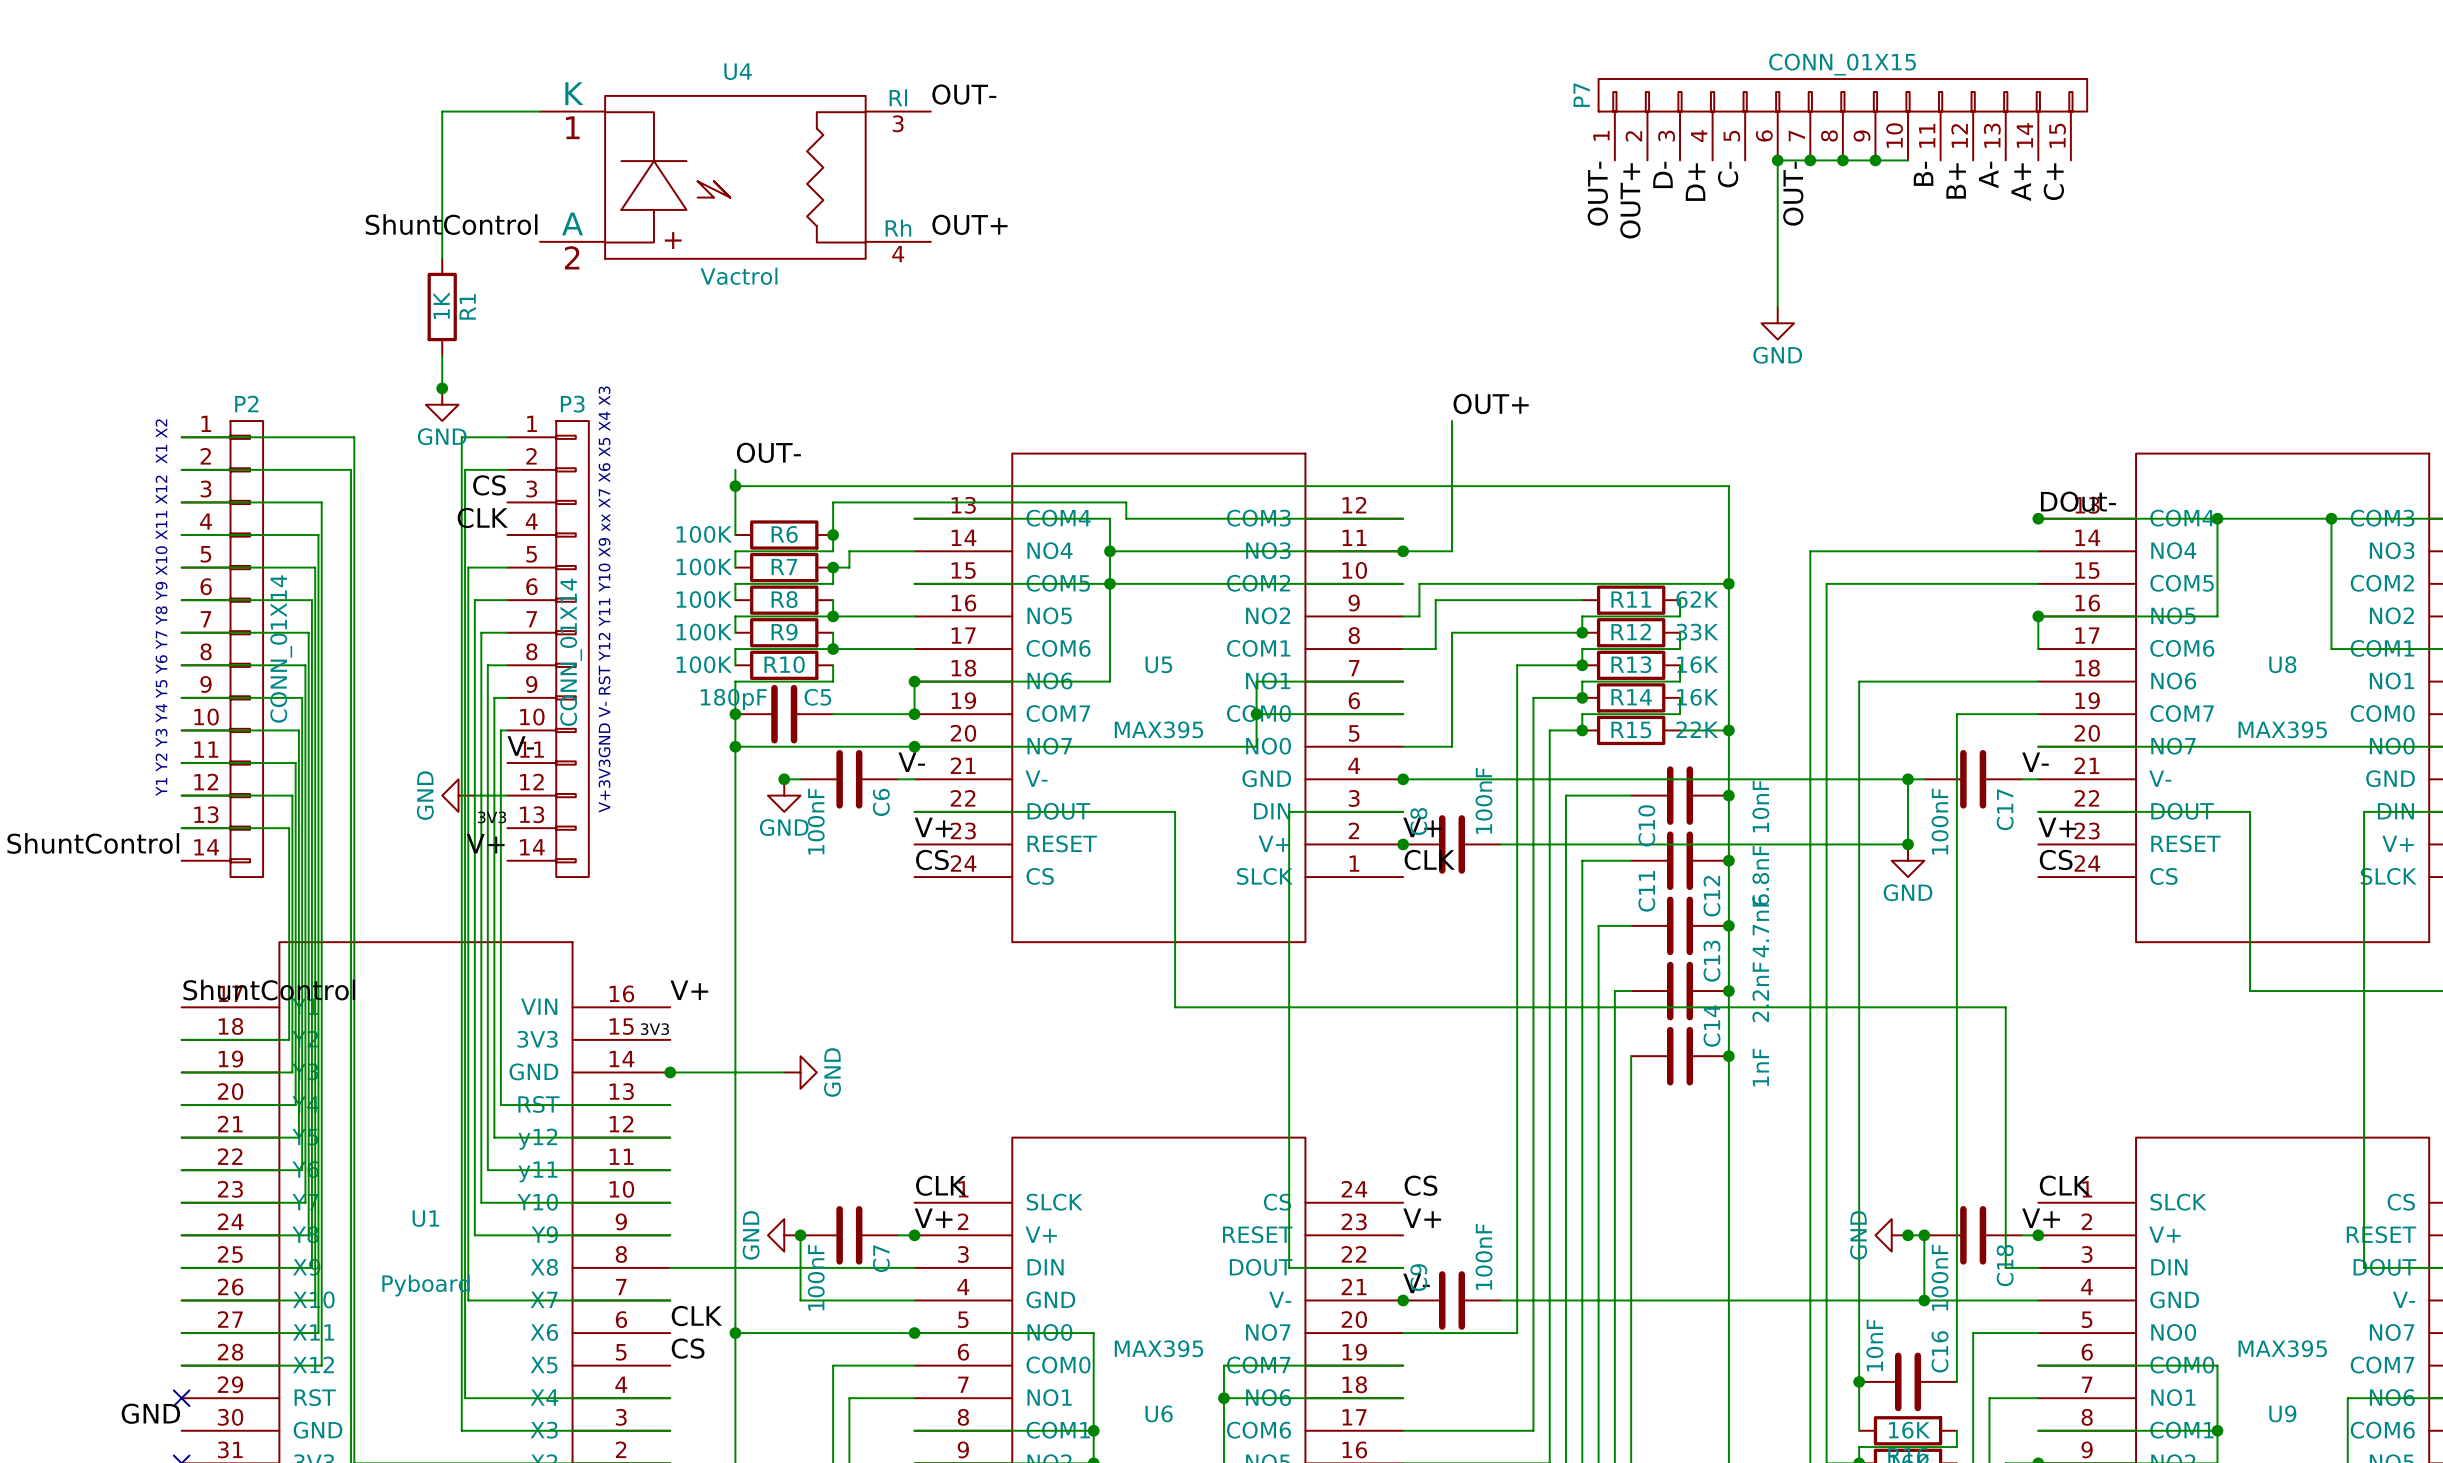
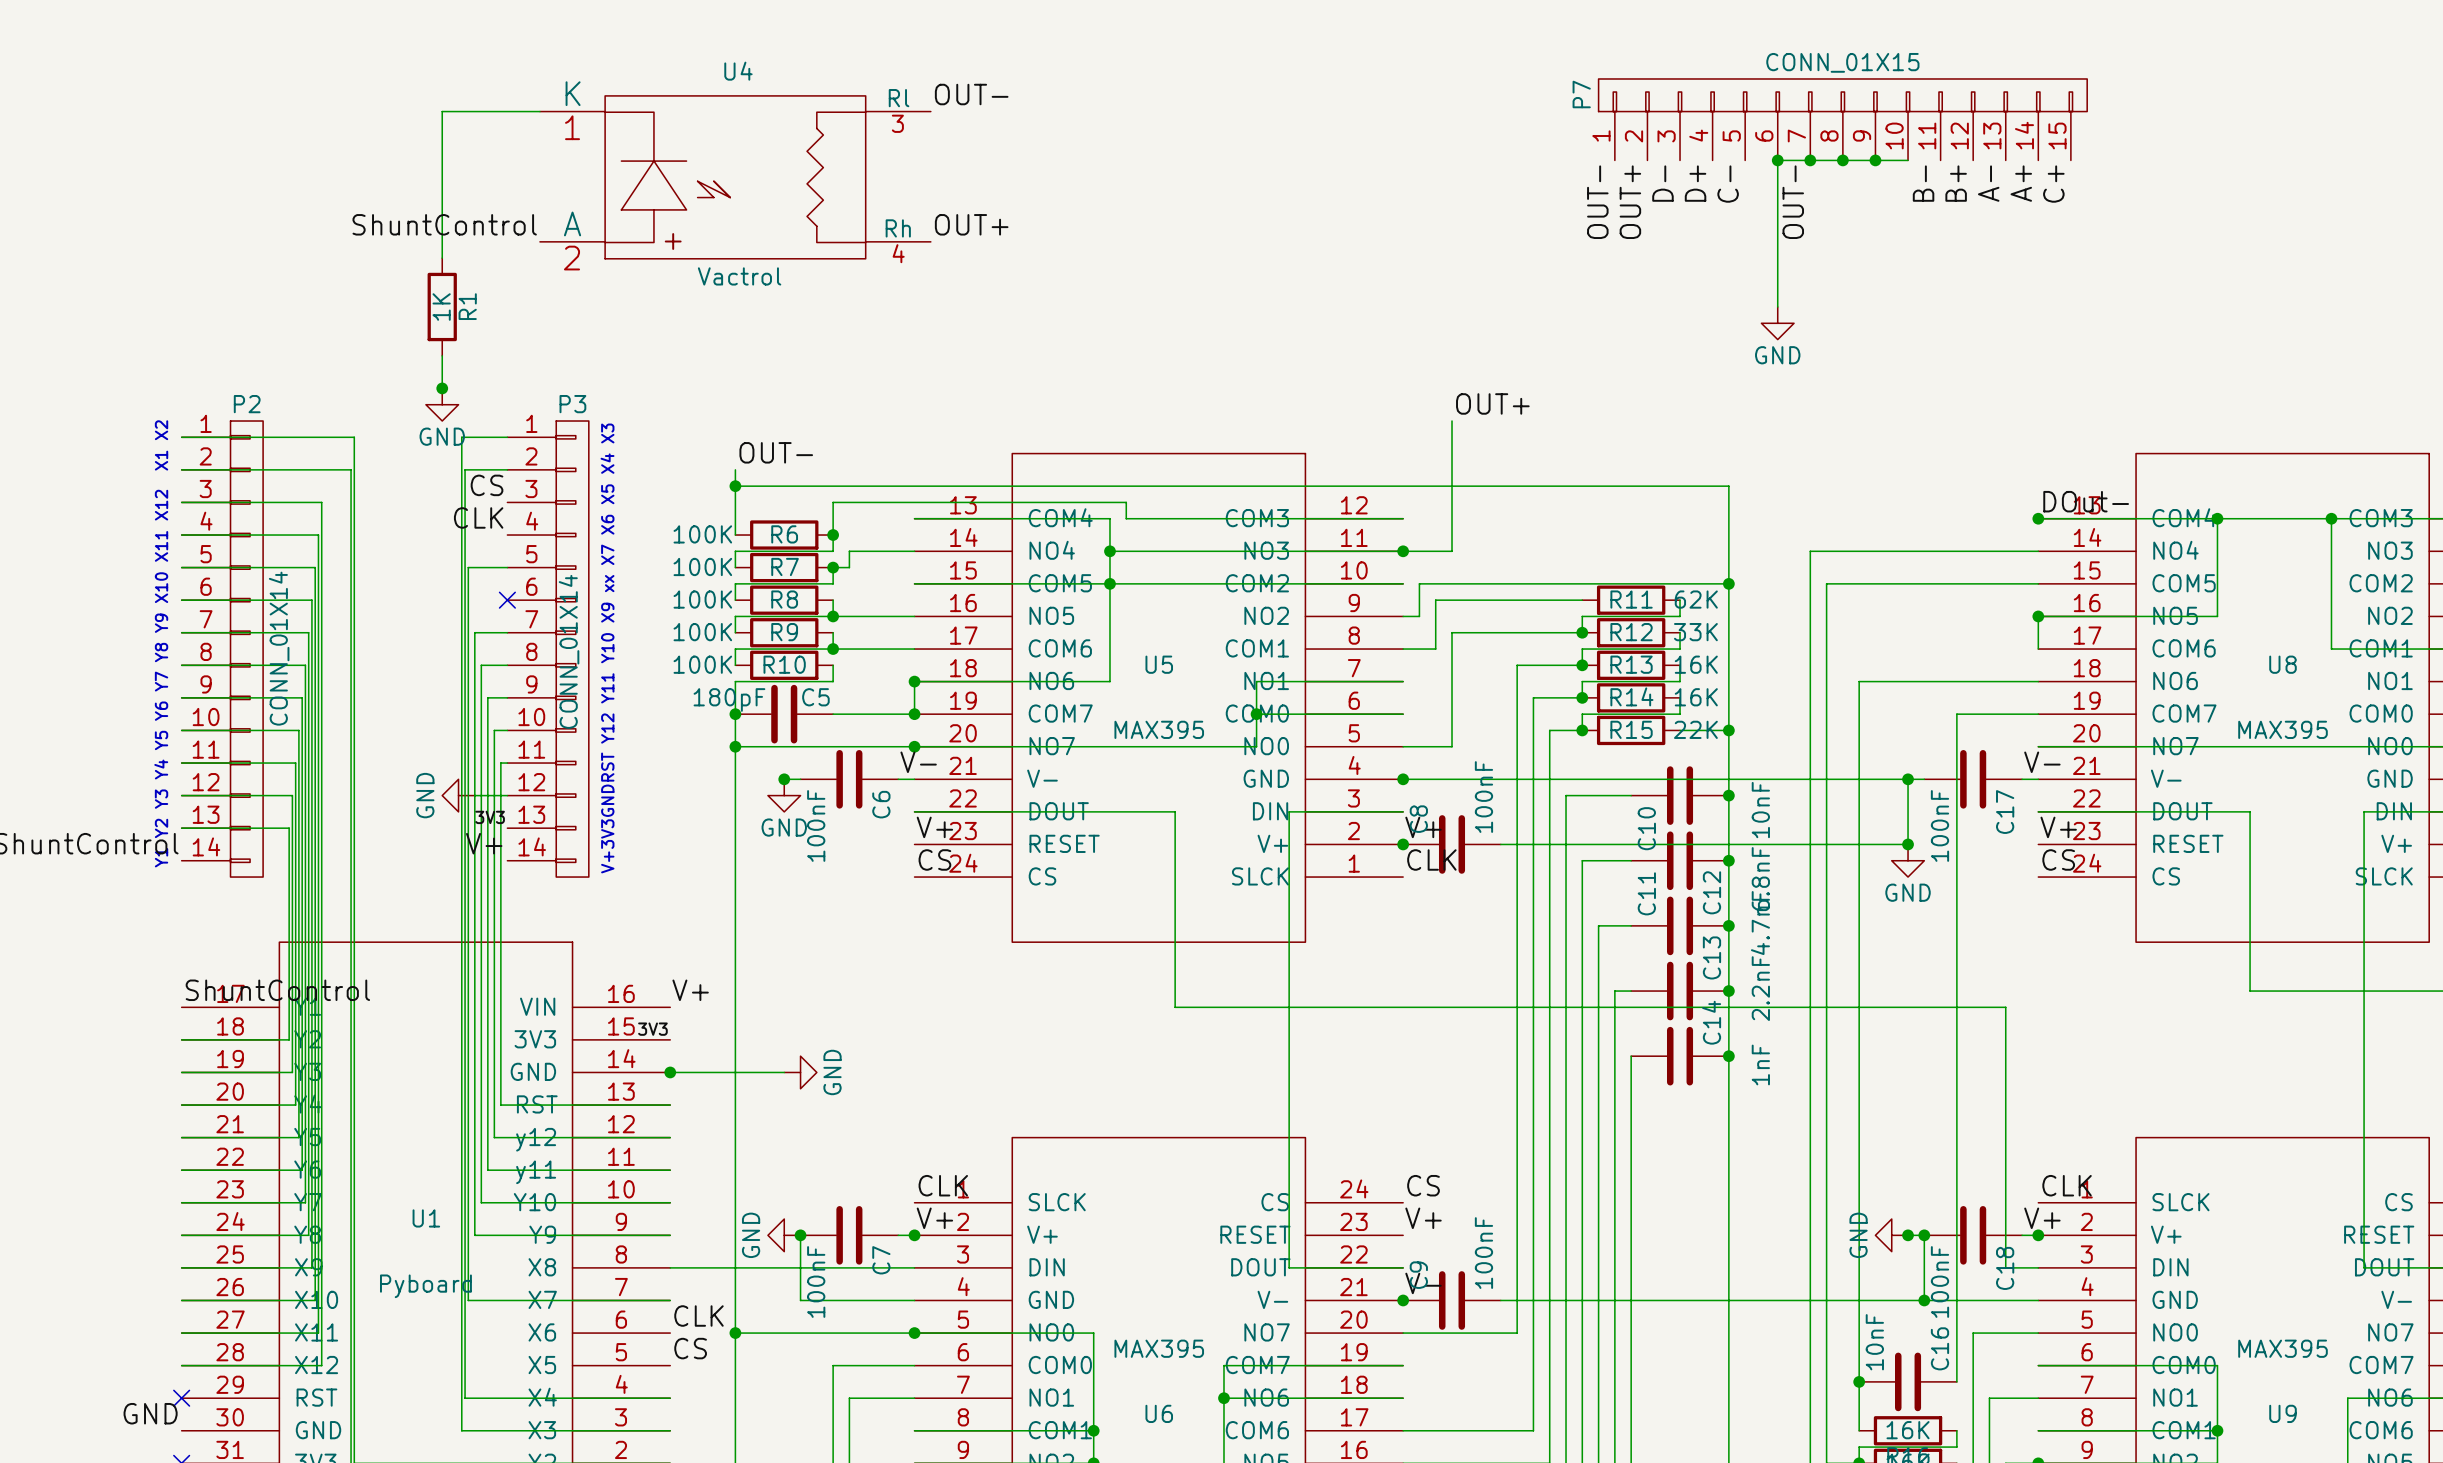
text: V+3V3GND V- RST Y12 Y11 Y10 X9 xx X7 X6 X5 X4 X3 (604, 599) -> V+3V3GNDRST Y12 Y11 Y10 X9 xx X7 X6 X5 X4 X3 (607, 648)
wire: (507, 600) (474, 600) (474, 632) -> none
no-connect mark: none -> (507, 600)
wire: (481, 632) (481, 665) -> (481, 632) (474, 632)
wire: (487, 665) (487, 697) -> (487, 665) (481, 665)
wire: (494, 697) (494, 730) -> (494, 697) (487, 697)
wire: (500, 730) (500, 763) -> (500, 730) (494, 730)
label: V- (520, 745) -> none
wire: none -> (500, 763) (507, 763)

